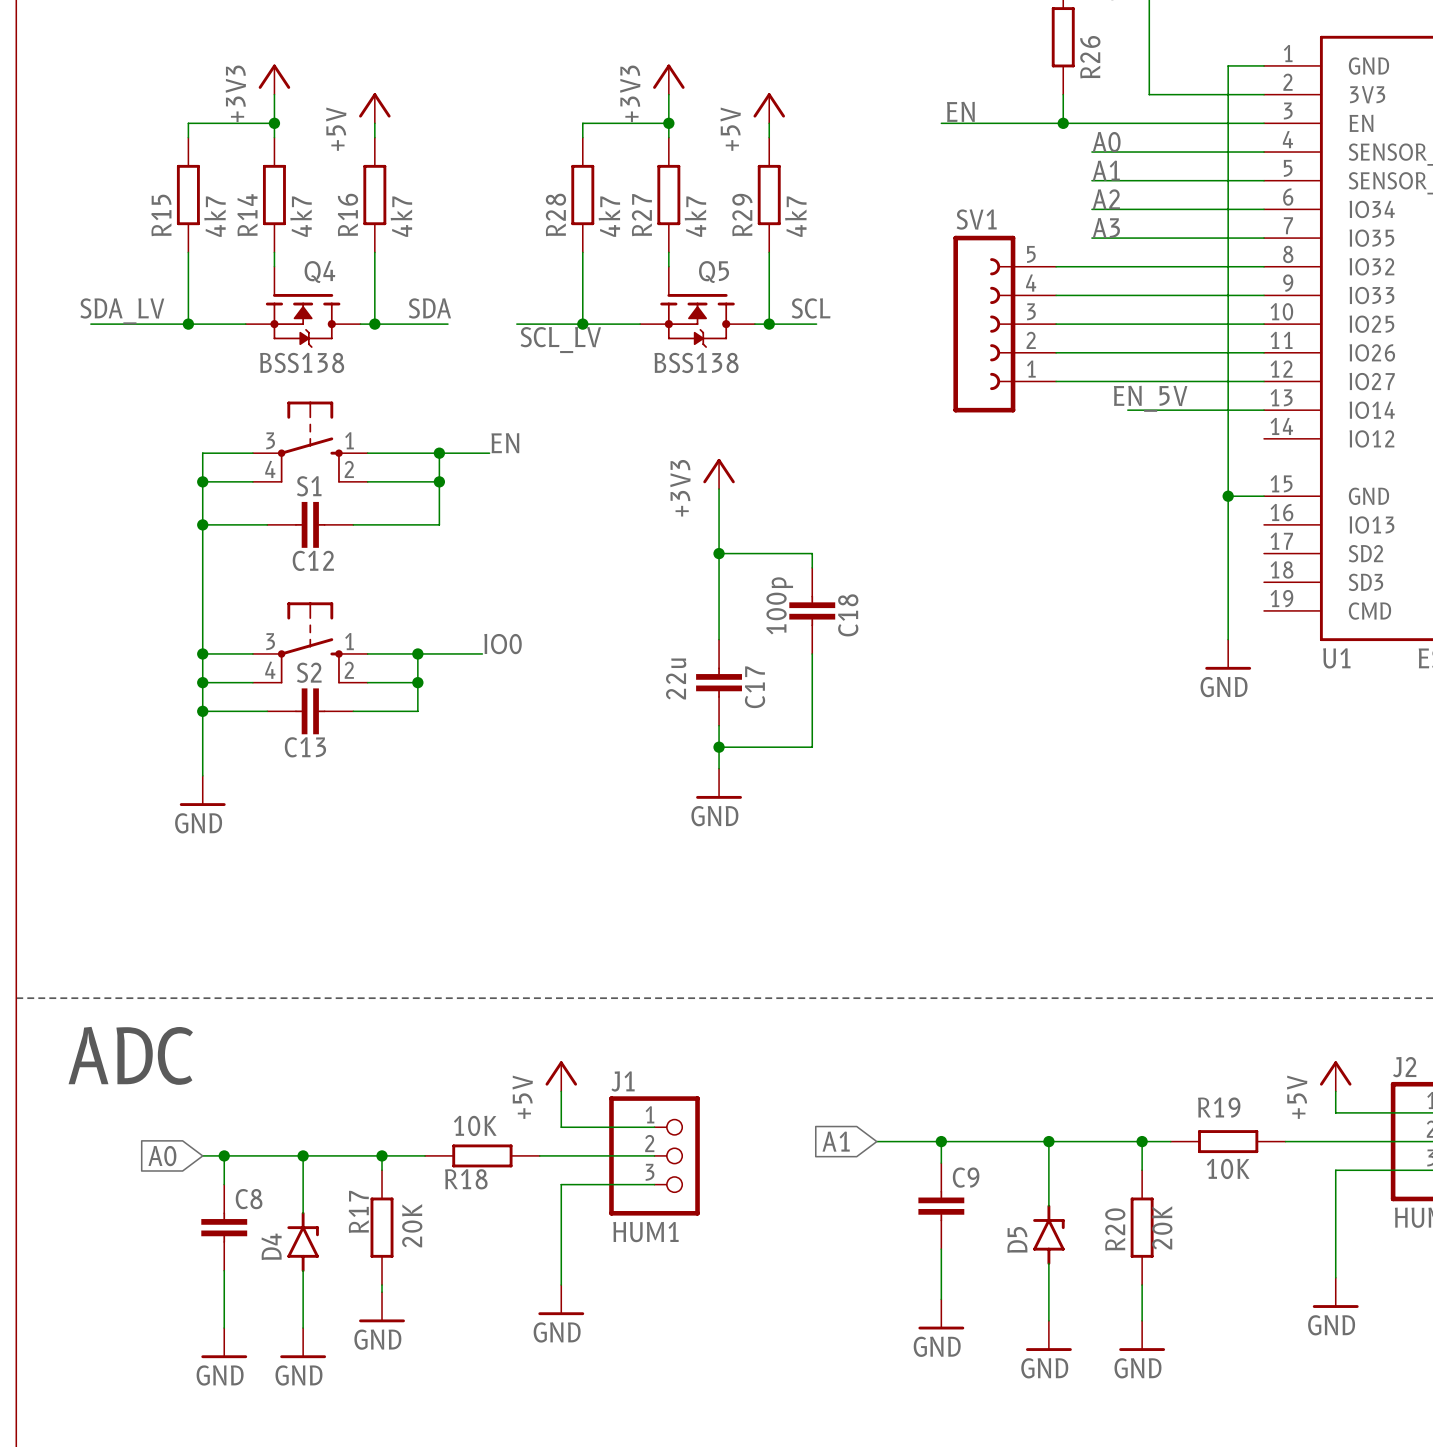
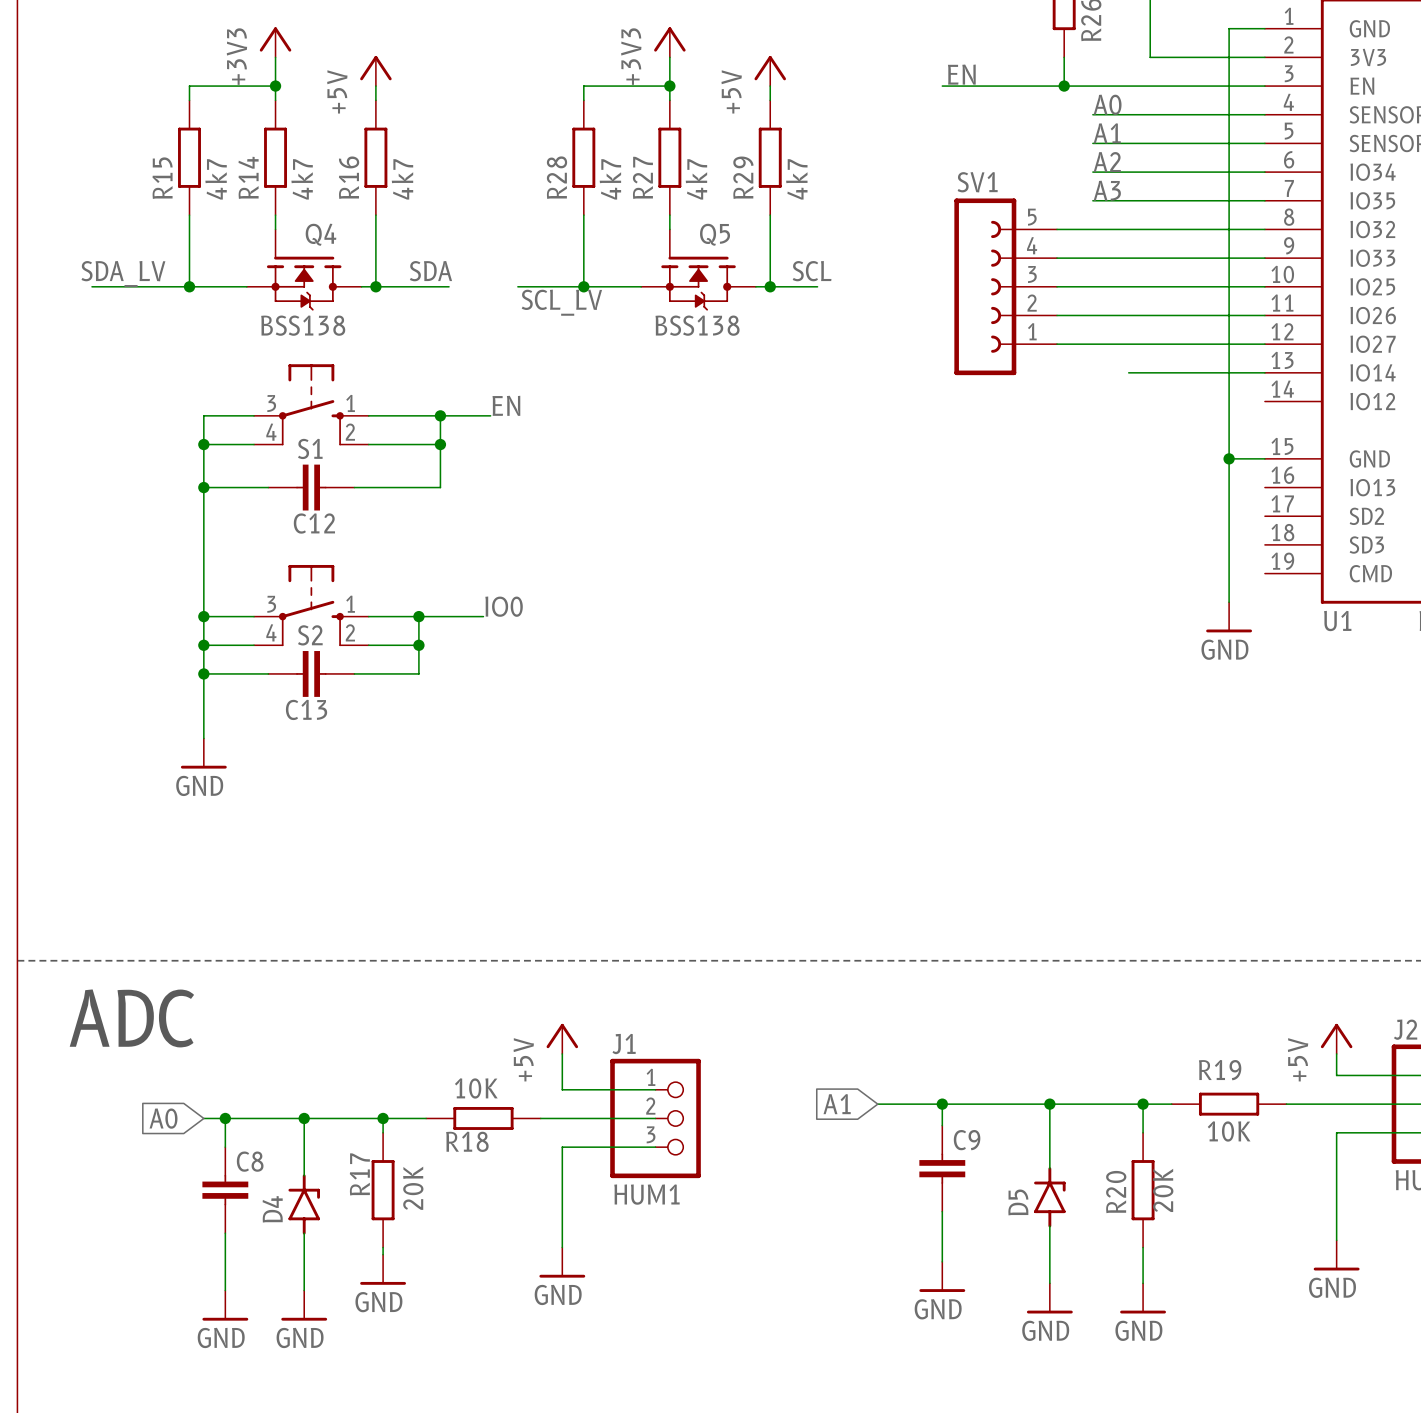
label: EN_5V (1150, 398) -> none
power symbol: +3V3 (719, 473) -> none
wire: (719, 489) (719, 639) -> none
wire: (719, 553) (812, 553) (812, 567) -> none
junction: (719, 553) -> none
C18: 100p (812, 610) -> none
wire: (812, 653) (812, 747) (719, 747) -> none
C17: 22u (719, 682) -> none
wire: (719, 725) (719, 768) -> none
junction: (719, 747) -> none
power symbol: GND (719, 783) -> none

